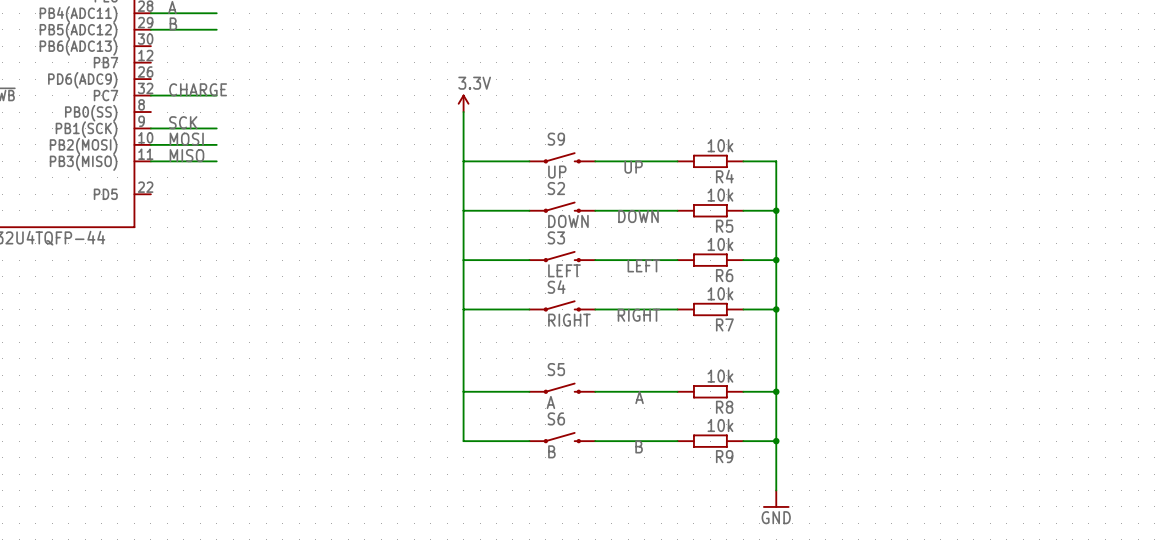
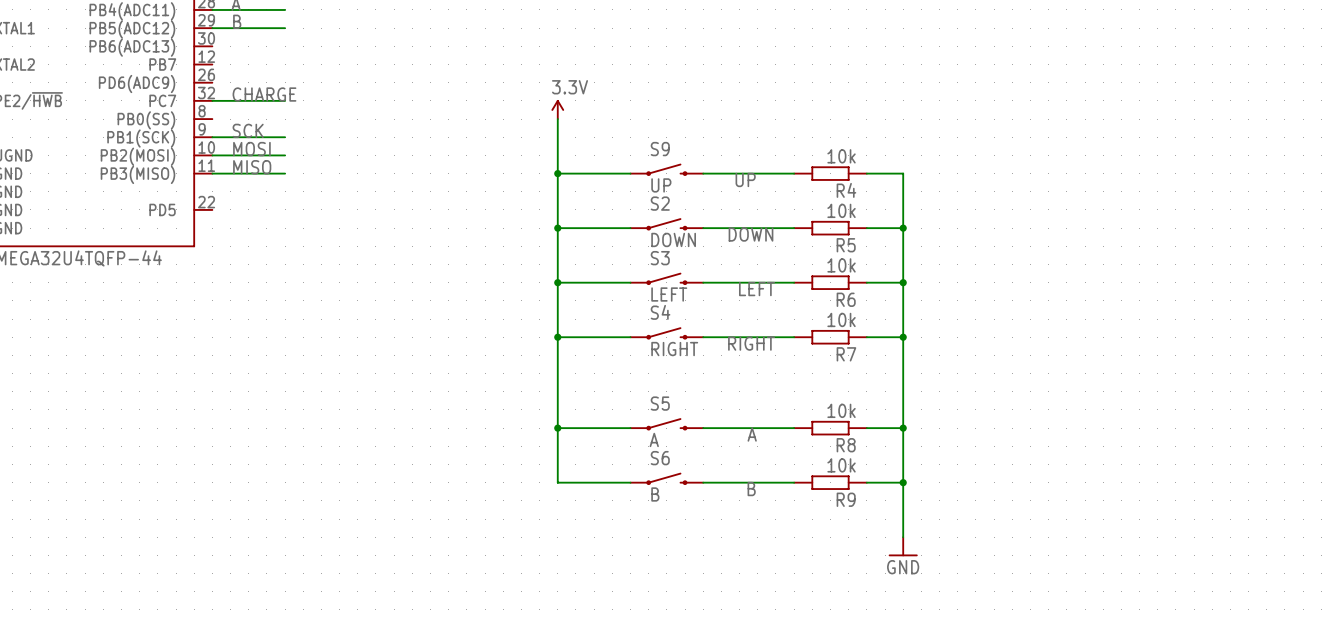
junction: none -> (557, 173)
junction: none -> (557, 228)
junction: none -> (557, 282)
junction: none -> (557, 337)
junction: none -> (557, 428)

